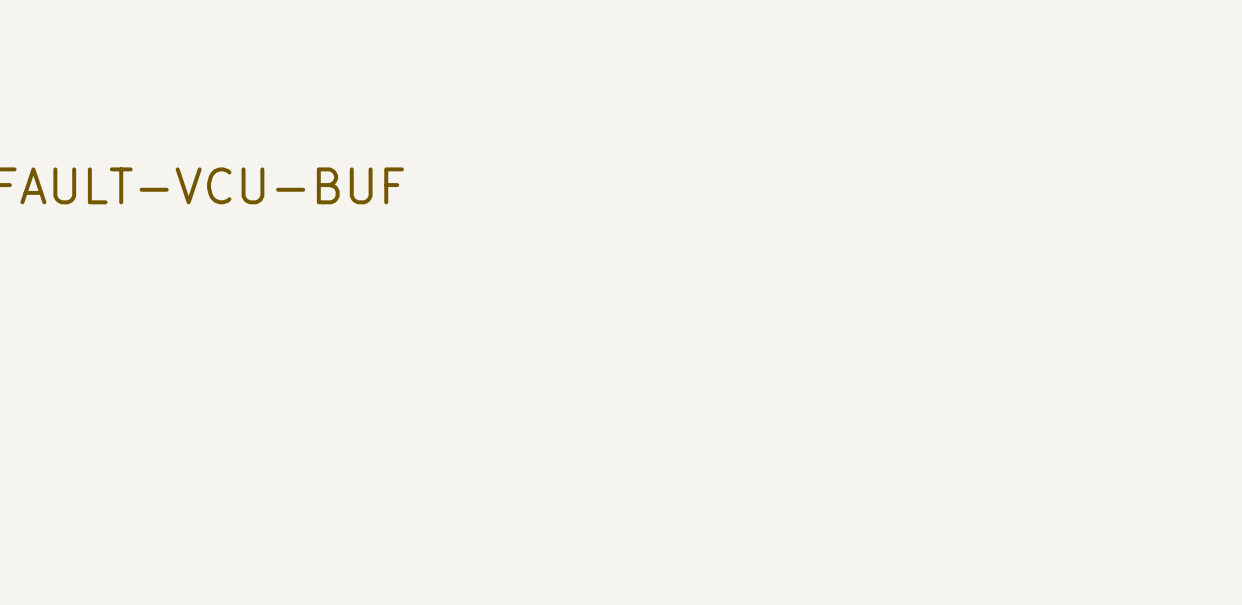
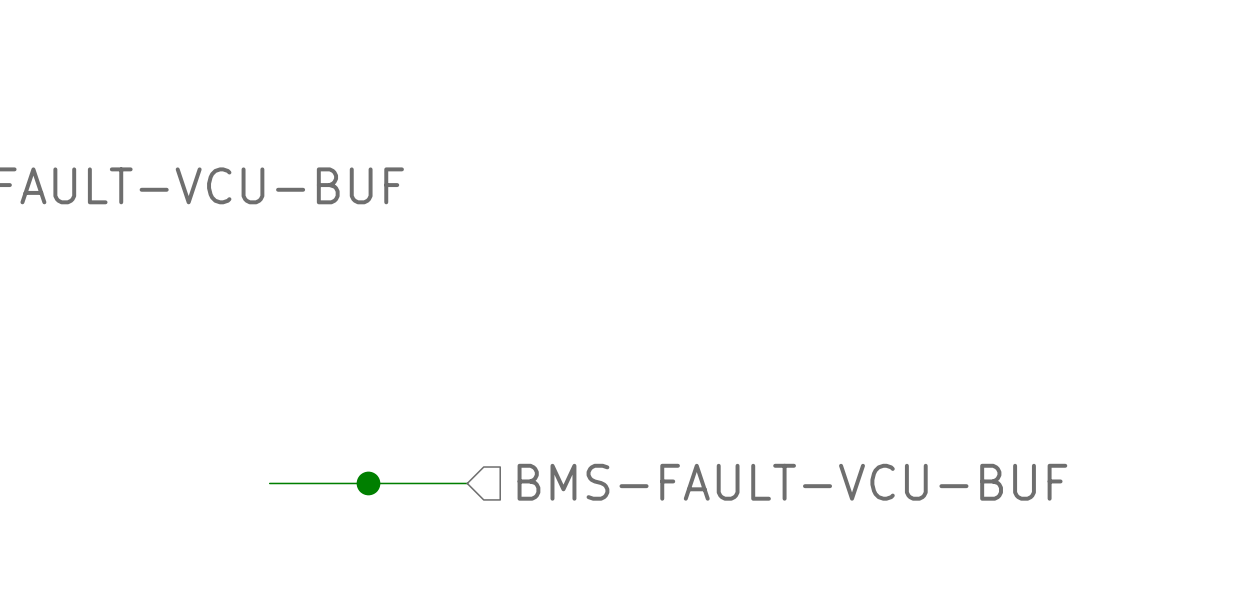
hierarchical label: none -> BMS-FAULT-VCU-BUF (792, 482)
wire: none -> (269, 483) (467, 483)
junction: none -> (368, 483)

